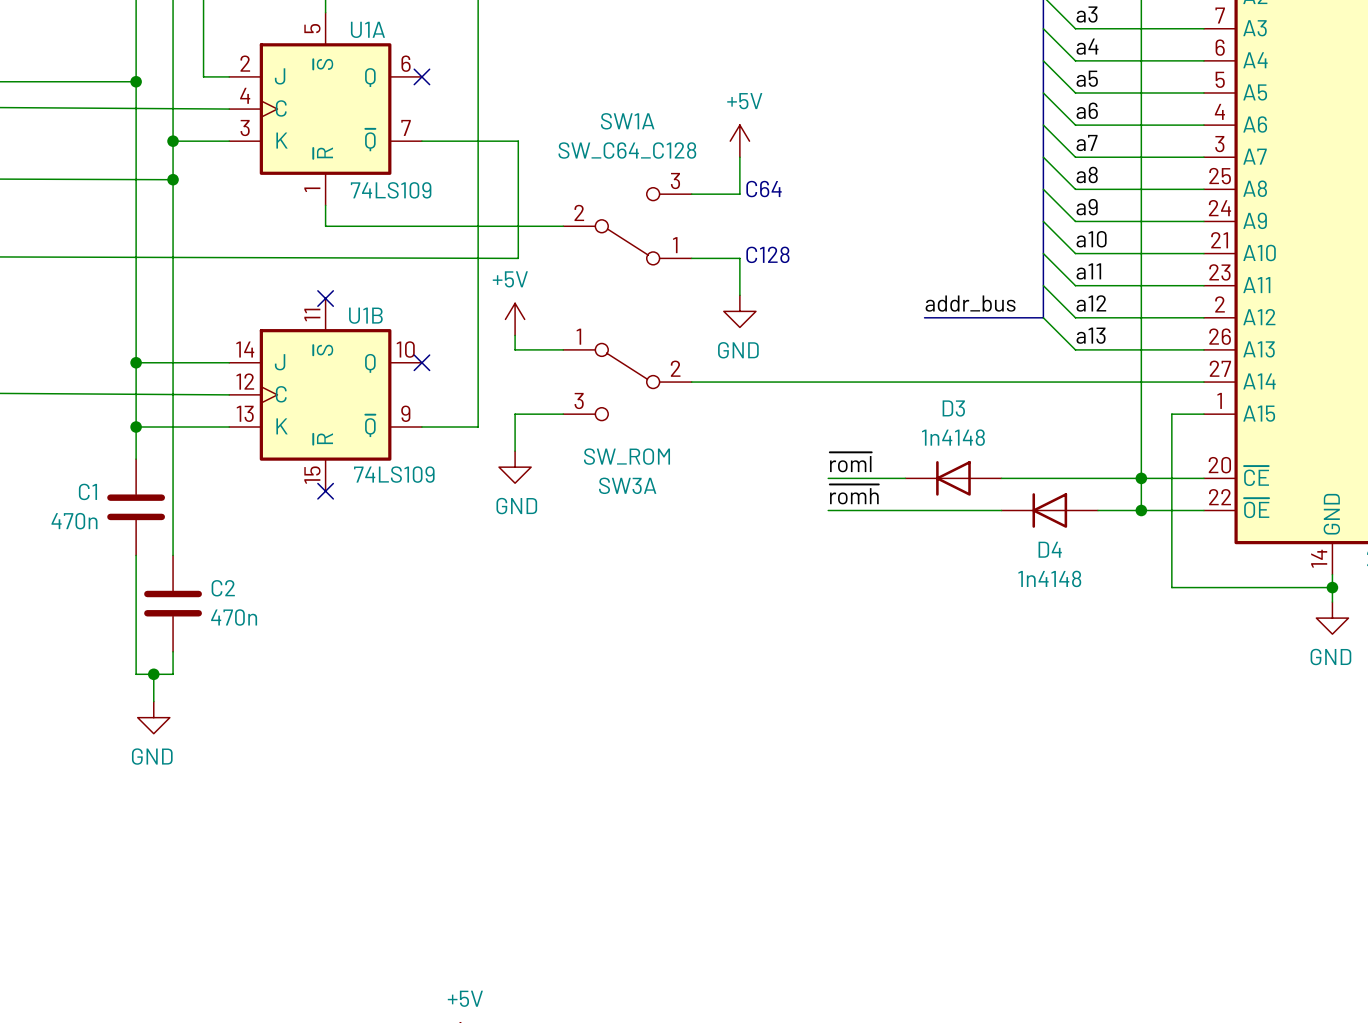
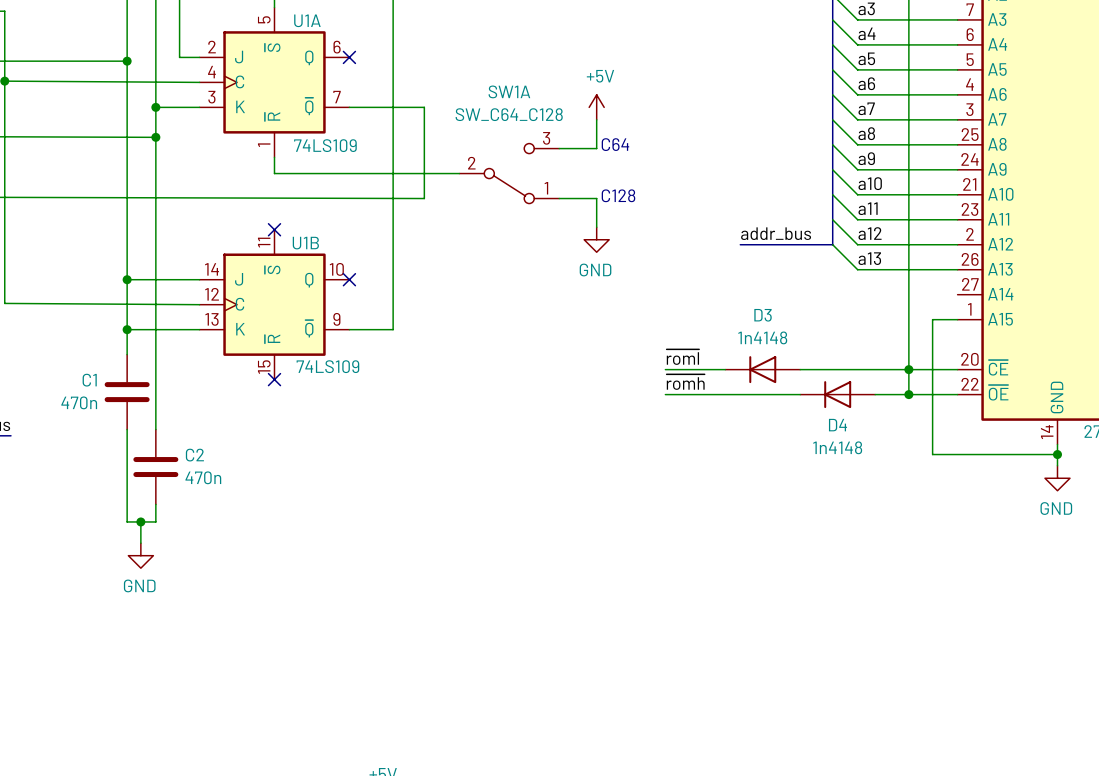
power symbol: +5V (515, 319) -> none
wire: (515, 335) (515, 349) (563, 349) -> none
SW3A: SW_ROM (627, 382) -> none
wire: (691, 382) (1203, 382) -> none
wire: (563, 414) (515, 414) (515, 451) -> none
power symbol: GND (515, 467) -> none

